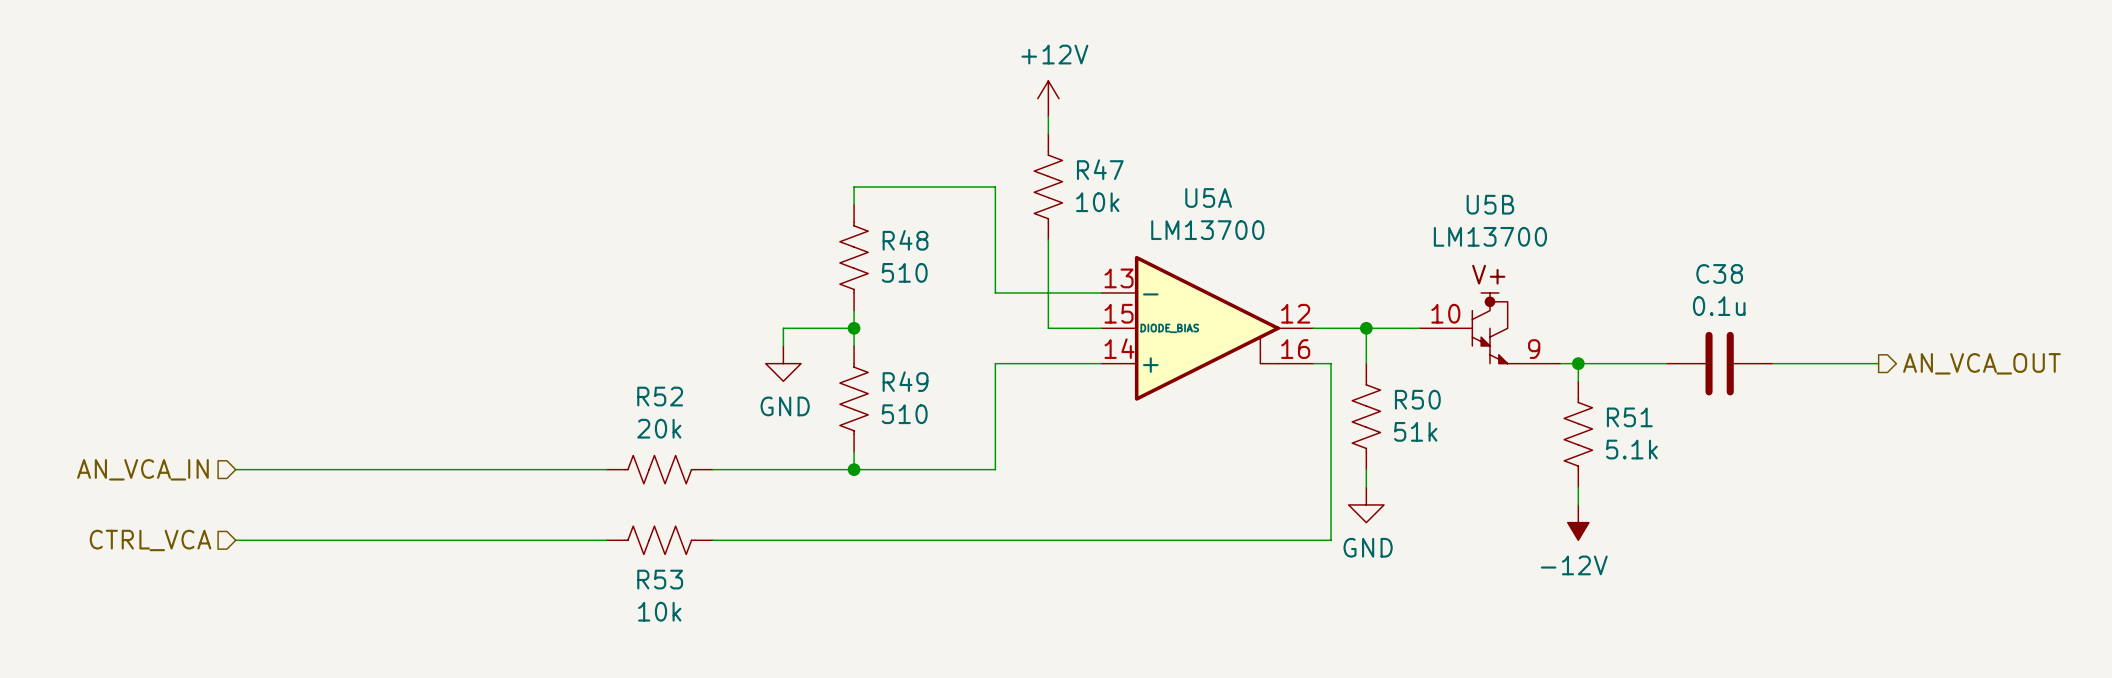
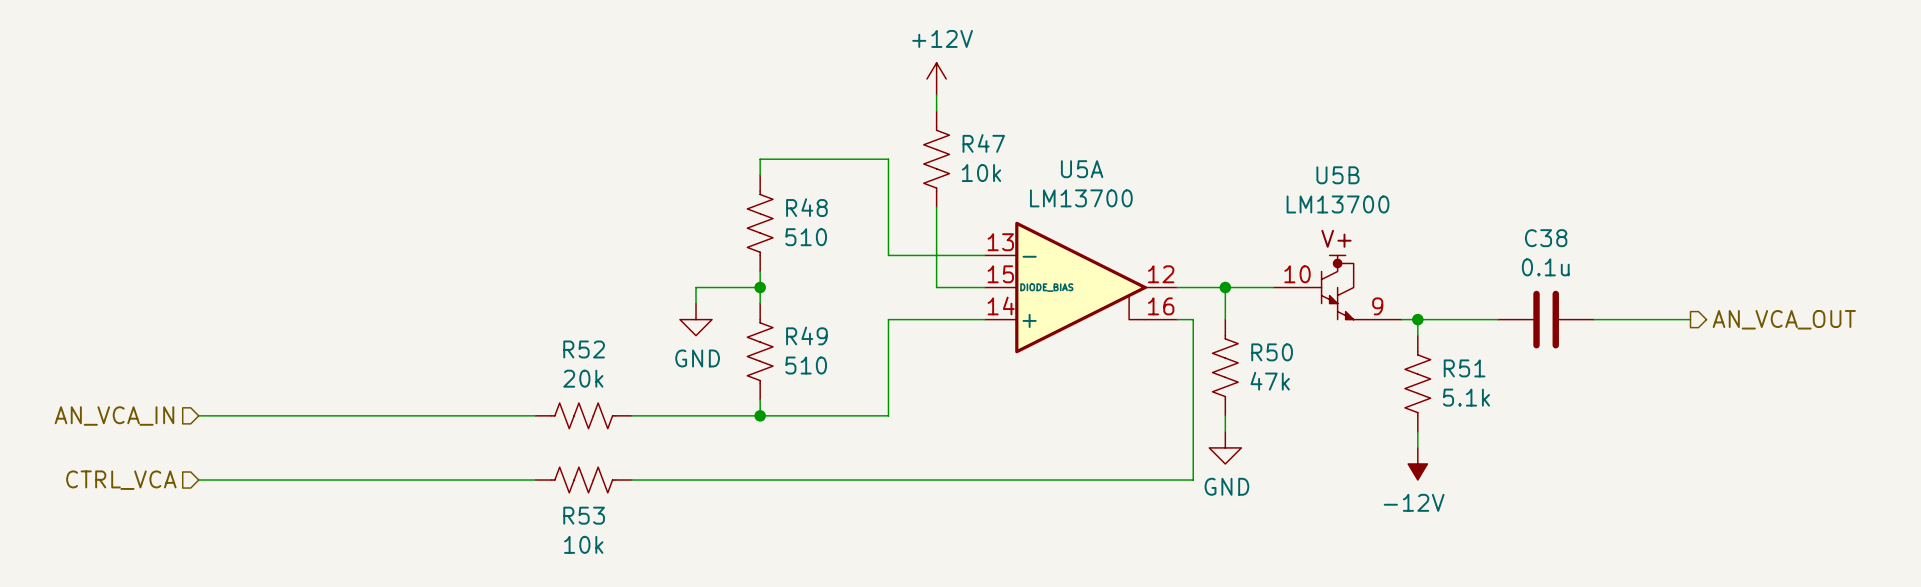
R50 value: 51k (1415, 431) -> 47k (1270, 381)

